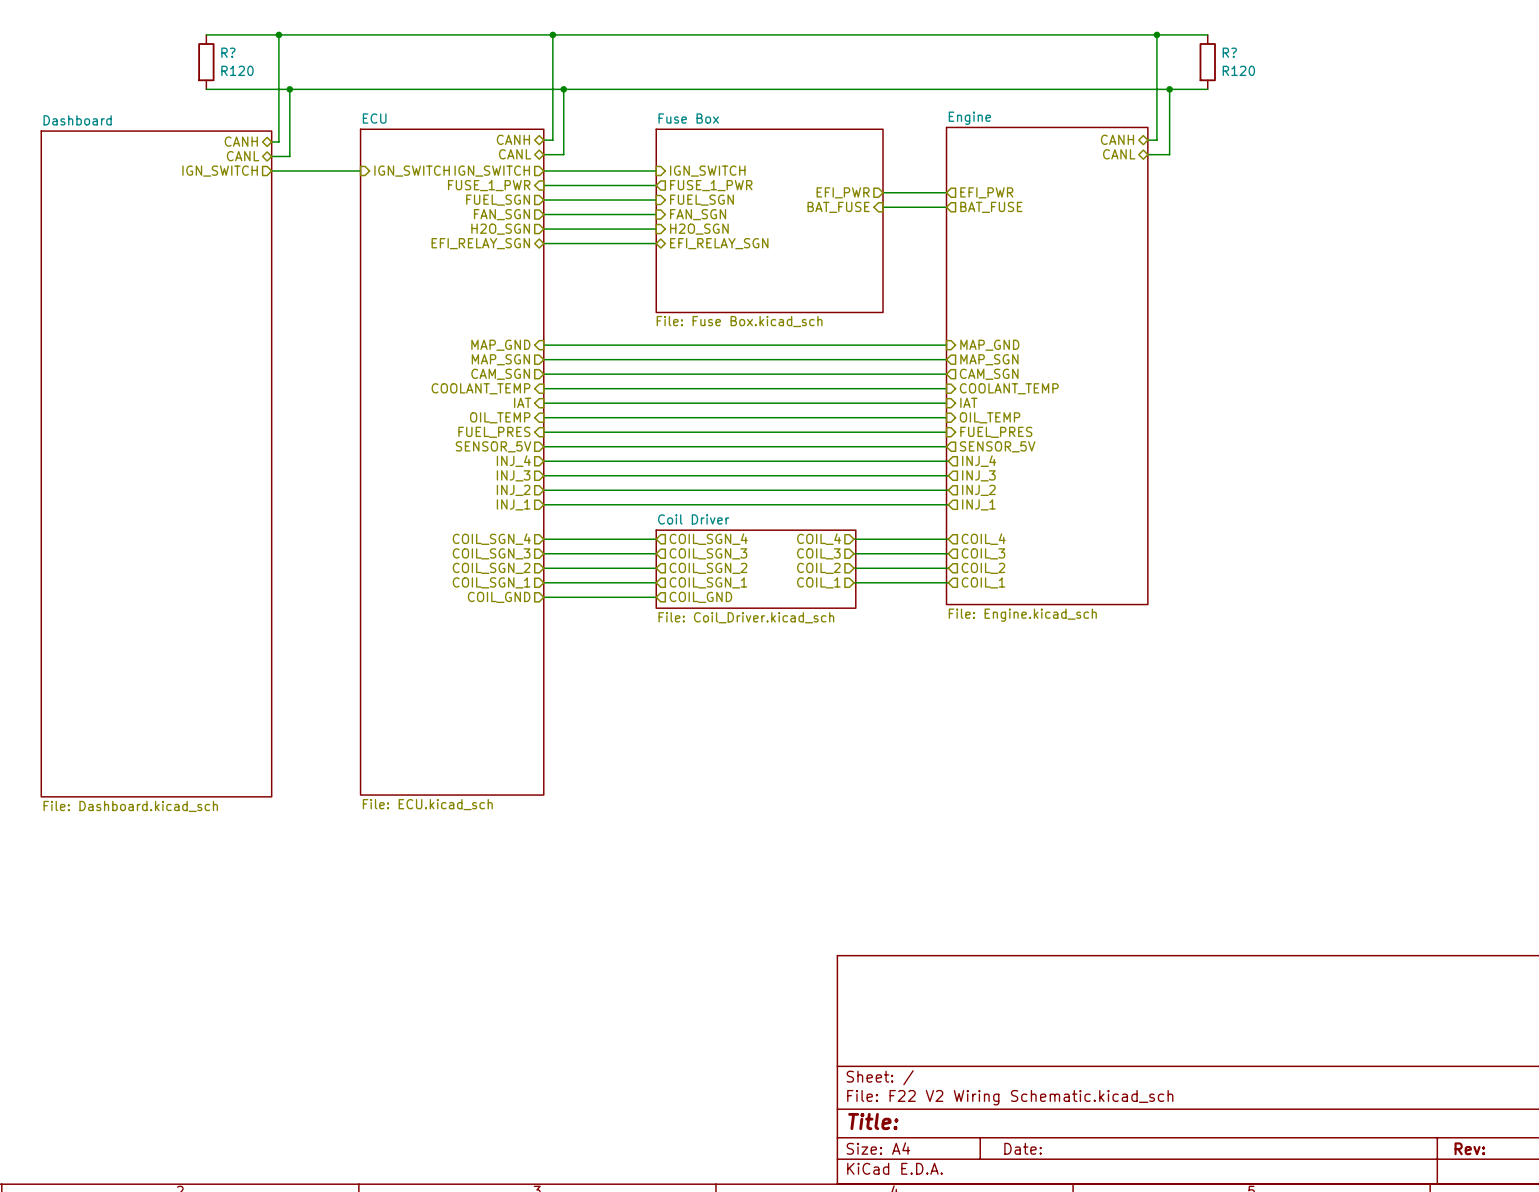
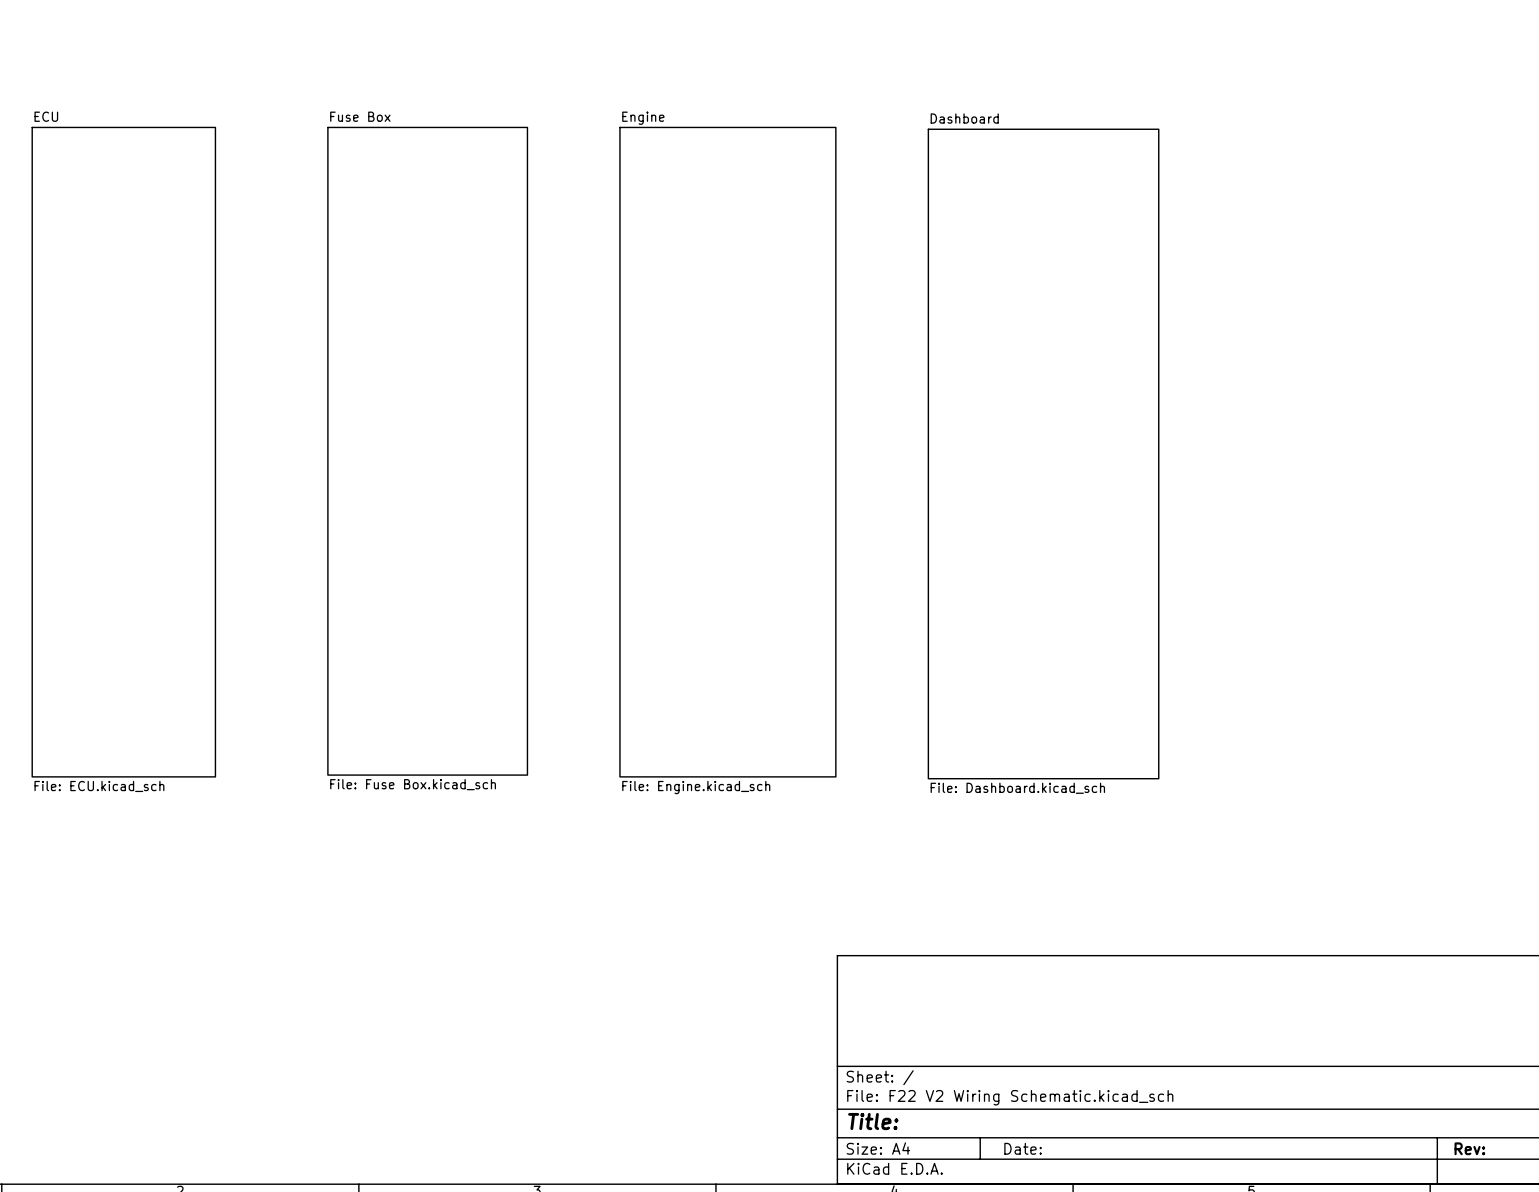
wire: (206, 34) (1207, 34) -> none
wire: (278, 34) (278, 141) (271, 141) -> none
junction: (278, 34) -> none
wire: (552, 34) (552, 140) (543, 140) -> none
junction: (552, 34) -> none
wire: (1156, 34) (1156, 140) (1147, 140) -> none
junction: (1156, 34) -> none
R?: R120 (206, 62) -> none
R?: R120 (1207, 62) -> none
wire: (206, 89) (1207, 89) -> none
wire: (289, 89) (289, 156) (271, 156) -> none
junction: (289, 89) -> none
wire: (563, 89) (563, 154) (543, 154) -> none
junction: (563, 89) -> none
wire: (1169, 89) (1169, 154) (1147, 154) -> none
junction: (1169, 89) -> none
hierarchical label: CANH (513, 139) -> none
hierarchical label: CANH (1117, 139) -> none
hierarchical label: CANH (241, 141) -> none
hierarchical label: CANL (515, 154) -> none
hierarchical label: CANL (1119, 154) -> none
hierarchical label: CANL (243, 156) -> none
wire: (271, 170) (360, 170) -> none
wire: (543, 170) (656, 170) -> none
hierarchical label: IGN_SWITCH (220, 171) -> none
hierarchical label: IGN_SWITCH (412, 171) -> none
hierarchical label: IGN_SWITCH (492, 171) -> none
hierarchical label: IGN_SWITCH (707, 171) -> none
hierarchical label: FUSE_1_PWR (489, 185) -> none
wire: (543, 185) (656, 185) -> none
hierarchical label: FUSE_1_PWR (711, 185) -> none
hierarchical label: EFI_PWR (843, 192) -> none
wire: (883, 192) (946, 192) -> none
hierarchical label: EFI_PWR (986, 192) -> none
hierarchical label: FUEL_SGN (498, 200) -> none
wire: (543, 200) (656, 200) -> none
hierarchical label: FUEL_SGN (701, 200) -> none
hierarchical label: BAT_FUSE (838, 207) -> none
wire: (883, 207) (946, 207) -> none
hierarchical label: BAT_FUSE (991, 207) -> none
hierarchical label: FAN_SGN (501, 214) -> none
wire: (543, 214) (656, 214) -> none
hierarchical label: FAN_SGN (698, 214) -> none
sheet Fuse Box: File: Fuse Box.kicad_sch (769, 220) -> none
hierarchical label: H2O_SGN (500, 229) -> none
wire: (543, 229) (656, 229) -> none
hierarchical label: H2O_SGN (699, 229) -> none
hierarchical label: EFI_RELAY_SGN (480, 243) -> none
wire: (543, 243) (656, 243) -> none
hierarchical label: EFI_RELAY_SGN (719, 243) -> none
hierarchical label: MAP_GND (500, 345) -> none
wire: (543, 345) (946, 345) -> none
hierarchical label: MAP_GND (989, 345) -> none
hierarchical label: MAP_SGN (500, 359) -> none
wire: (543, 359) (946, 359) -> none
hierarchical label: MAP_SGN (989, 359) -> none
sheet Engine: File: Engine.kicad_sch (1047, 366) -> none
hierarchical label: CAM_SGN (500, 374) -> none
wire: (543, 374) (946, 374) -> none
hierarchical label: CAM_SGN (989, 374) -> none
hierarchical label: COOLANT_TEMP (481, 388) -> none
wire: (543, 388) (946, 388) -> none
hierarchical label: COOLANT_TEMP (1009, 388) -> none
hierarchical label: IAT (522, 402) -> none
hierarchical label: IAT (968, 402) -> none
wire: (543, 403) (946, 403) -> none
hierarchical label: OIL_TEMP (500, 417) -> none
wire: (543, 417) (946, 417) -> none
hierarchical label: OIL_TEMP (990, 417) -> none
hierarchical label: FUEL_PRES (494, 432) -> none
wire: (543, 432) (946, 432) -> none
hierarchical label: FUEL_PRES (996, 432) -> none
hierarchical label: SENSOR_5V (493, 446) -> none
wire: (543, 446) (946, 446) -> none
hierarchical label: SENSOR_5V (997, 446) -> none
sheet Fuse Box: none -> File: Fuse Box.kicad_sch (427, 451)
sheet ECU: none -> File: ECU.kicad_sch (123, 452)
sheet Engine: none -> File: Engine.kicad_sch (727, 452)
sheet Dashboard: none -> File: Dashboard.kicad_sch (1043, 453)
hierarchical label: INJ_4 (513, 461) -> none
wire: (543, 461) (948, 461) -> none
hierarchical label: INJ_4 (979, 461) -> none
sheet ECU: File: ECU.kicad_sch (452, 462) -> none
sheet Dashboard: File: Dashboard.kicad_sch (156, 463) -> none
hierarchical label: INJ_3 (513, 475) -> none
wire: (543, 475) (948, 475) -> none
hierarchical label: INJ_3 (978, 475) -> none
hierarchical label: INJ_2 (513, 490) -> none
wire: (543, 490) (948, 490) -> none
hierarchical label: INJ_2 (978, 490) -> none
hierarchical label: INJ_1 (513, 504) -> none
wire: (543, 504) (948, 504) -> none
hierarchical label: INJ_1 (978, 504) -> none
hierarchical label: COIL_SGN_4 (491, 539) -> none
wire: (543, 539) (656, 539) -> none
hierarchical label: COIL_SGN_4 (708, 539) -> none
hierarchical label: COIL_4 (819, 539) -> none
wire: (853, 539) (948, 539) -> none
hierarchical label: COIL_4 (983, 539) -> none
hierarchical label: COIL_SGN_3 (491, 553) -> none
wire: (543, 553) (656, 553) -> none
hierarchical label: COIL_SGN_3 (708, 553) -> none
hierarchical label: COIL_3 (818, 553) -> none
wire: (853, 553) (948, 553) -> none
hierarchical label: COIL_3 (983, 553) -> none
hierarchical label: COIL_SGN_2 (491, 568) -> none
wire: (543, 568) (656, 568) -> none
hierarchical label: COIL_SGN_2 (708, 568) -> none
hierarchical label: COIL_2 (818, 568) -> none
wire: (853, 568) (948, 568) -> none
hierarchical label: COIL_2 (983, 568) -> none
sheet Coil Driver: File: Coil_Driver.kicad_sch (756, 569) -> none
hierarchical label: COIL_SGN_1 (491, 582) -> none
wire: (543, 582) (656, 582) -> none
hierarchical label: COIL_SGN_1 (708, 582) -> none
hierarchical label: COIL_1 (818, 582) -> none
wire: (853, 582) (948, 582) -> none
hierarchical label: COIL_1 (983, 582) -> none
hierarchical label: COIL_GND (499, 597) -> none
wire: (543, 597) (656, 597) -> none
hierarchical label: COIL_GND (700, 597) -> none

